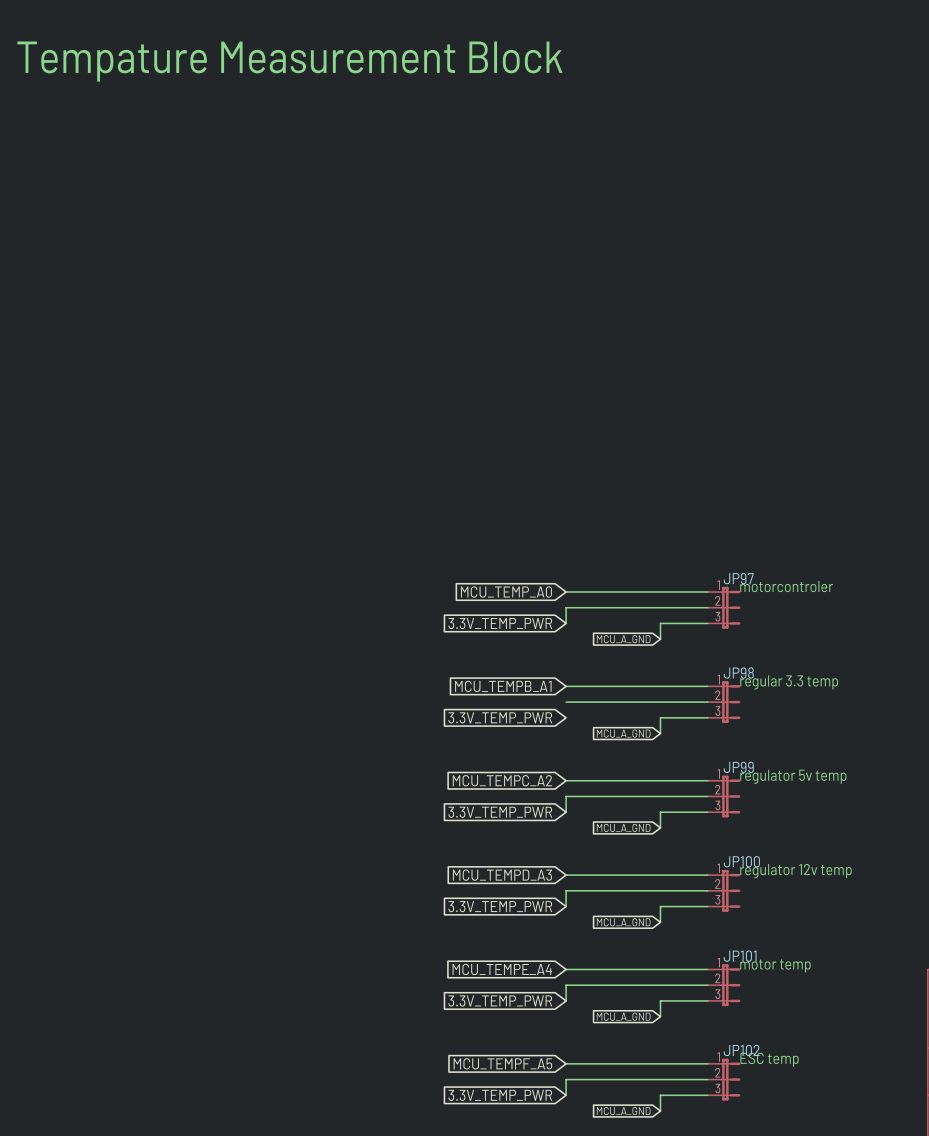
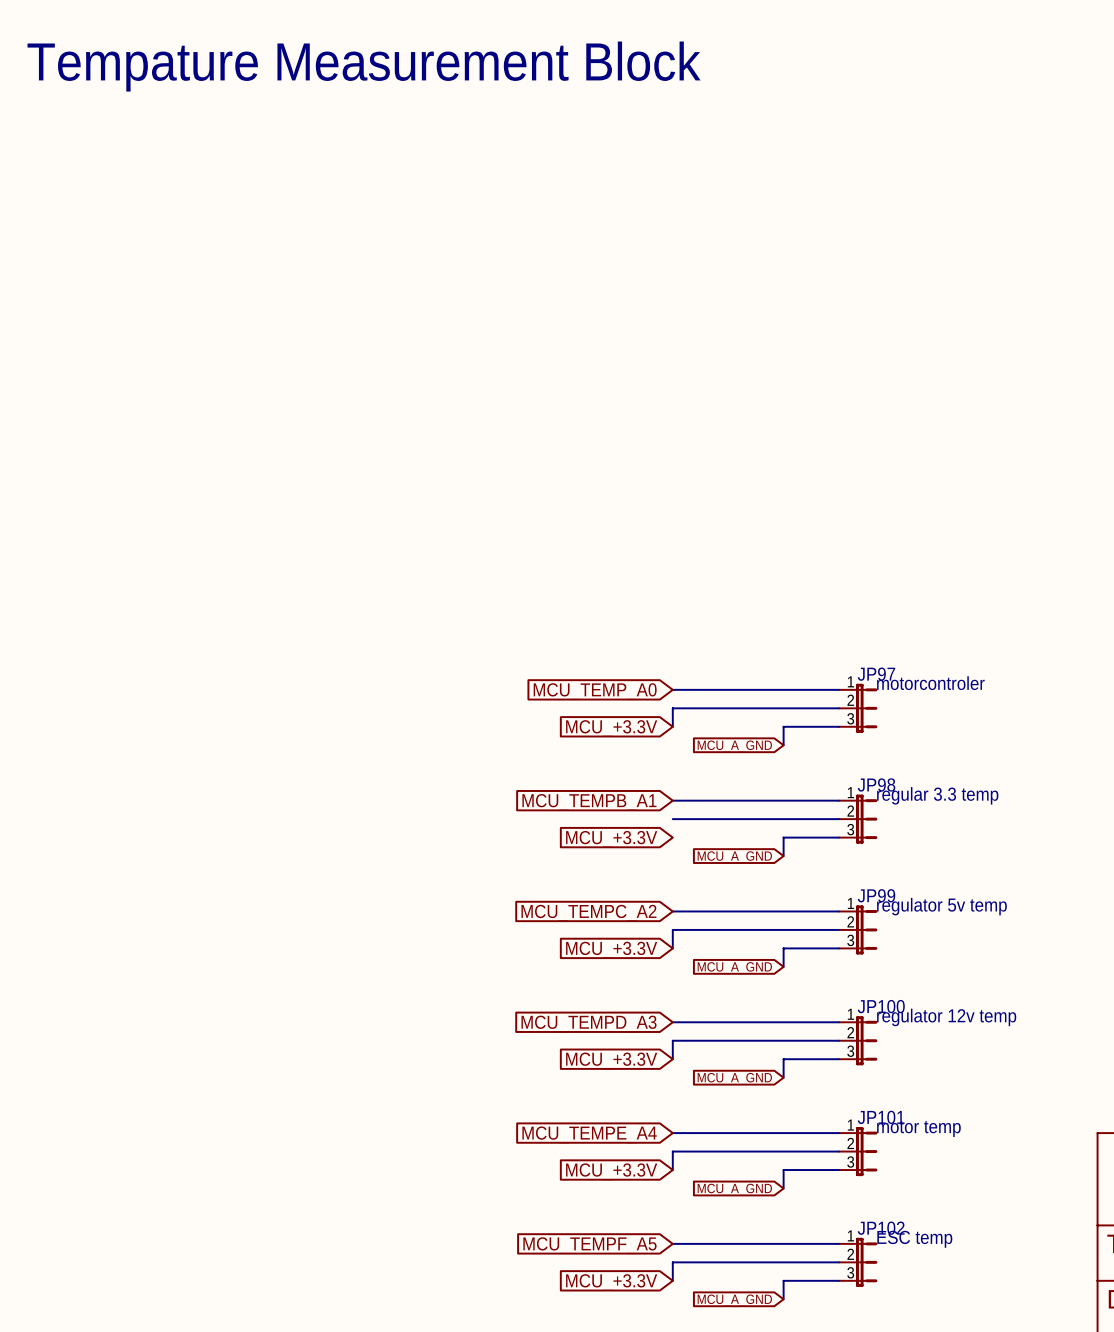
global label: 3.3V_TEMP_PWR (500, 623) -> MCU_+3.3V (611, 728)
global label: 3.3V_TEMP_PWR (500, 717) -> MCU_+3.3V (611, 839)
global label: 3.3V_TEMP_PWR (500, 812) -> MCU_+3.3V (611, 950)
global label: 3.3V_TEMP_PWR (500, 906) -> MCU_+3.3V (611, 1060)
global label: 3.3V_TEMP_PWR (500, 1000) -> MCU_+3.3V (611, 1171)
global label: 3.3V_TEMP_PWR (500, 1095) -> MCU_+3.3V (611, 1282)

